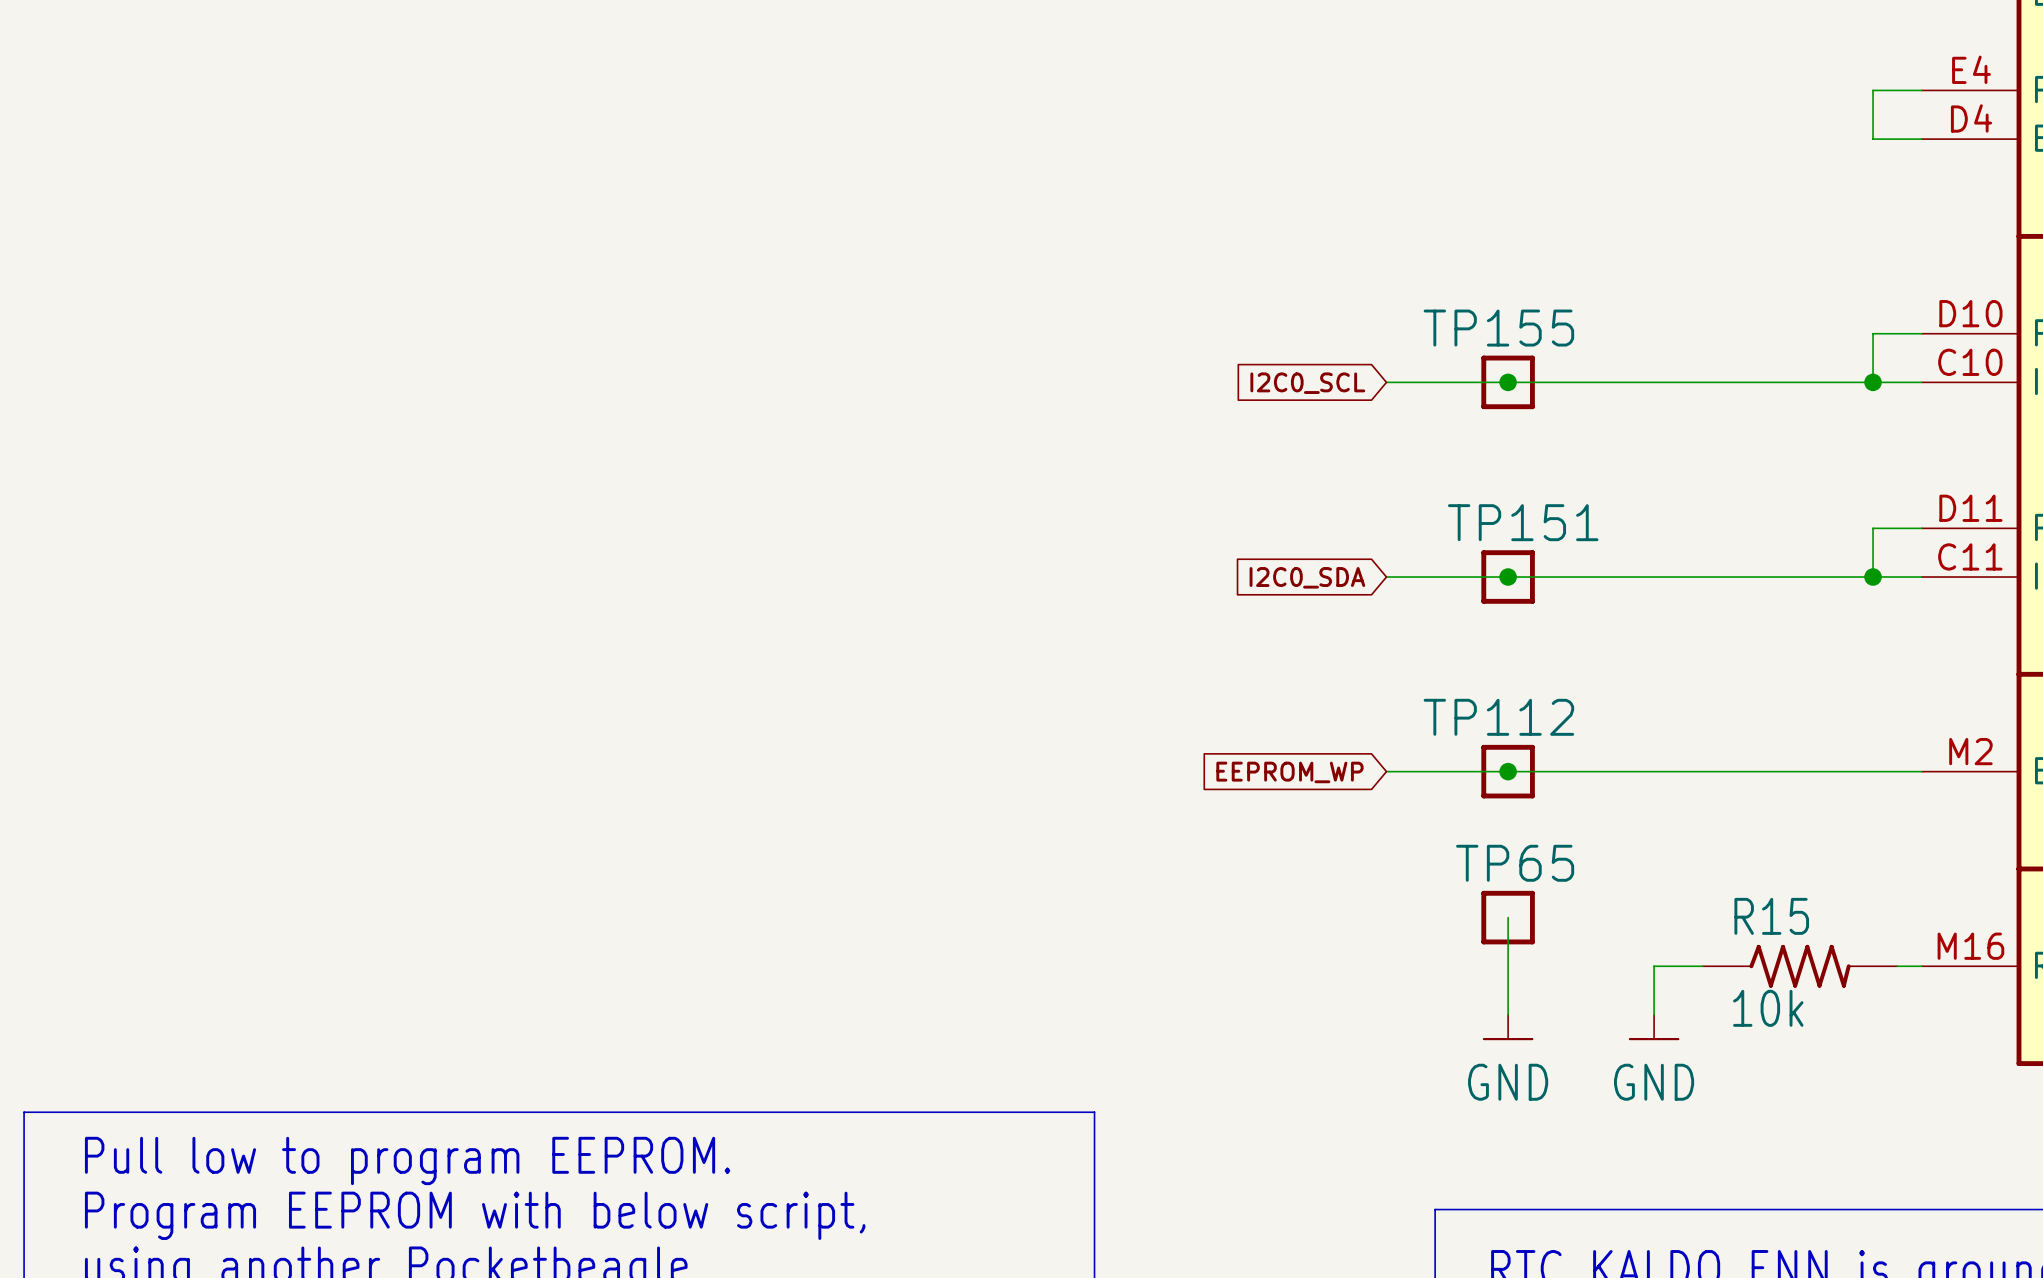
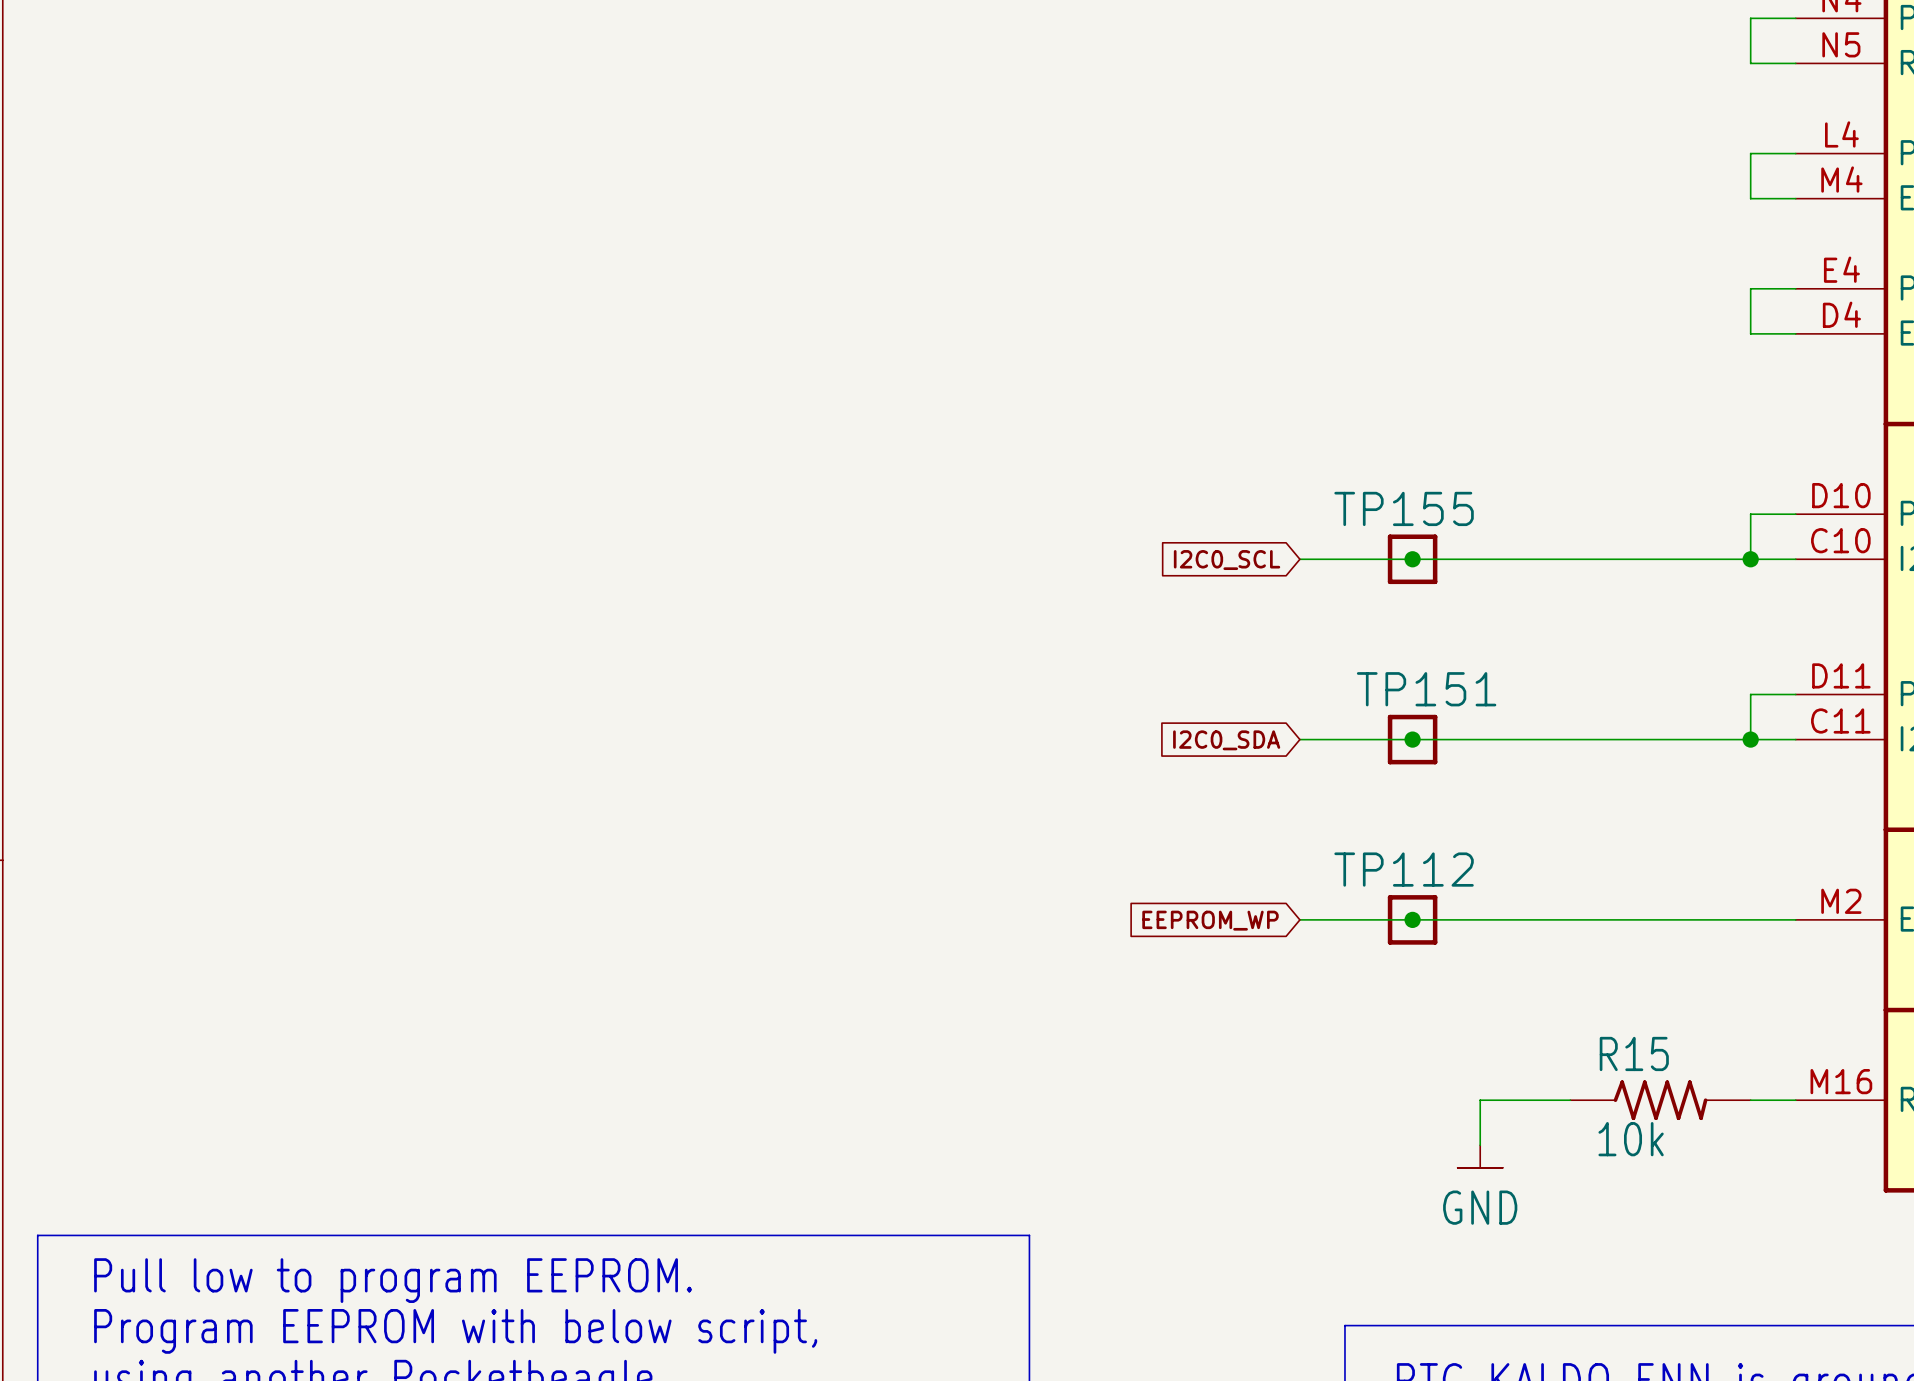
wire: (1508, 917) (1508, 1014) -> none
TP65: (1508, 917) -> none
wire: (1654, 966) (1654, 1014) -> (1547, 1100) (1480, 1100) (1480, 1145)
R15 position: (1800, 966) -> (1660, 1100)
power symbol: GND (1508, 1027) -> none
power symbol: none -> GND (1480, 1156)
power symbol: GND (1654, 1027) -> none

